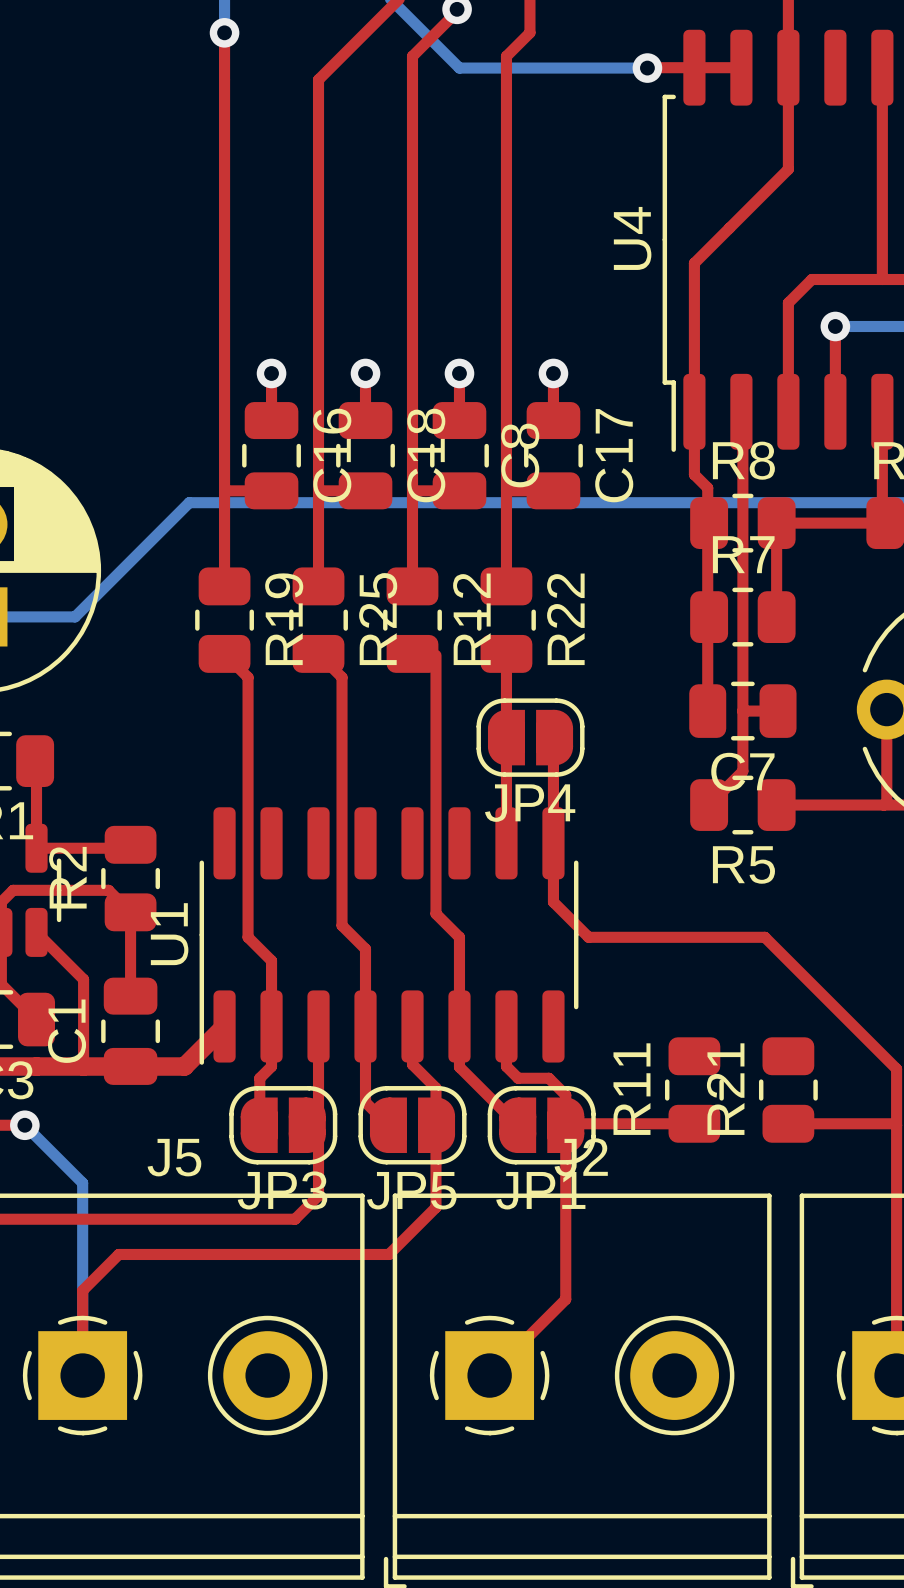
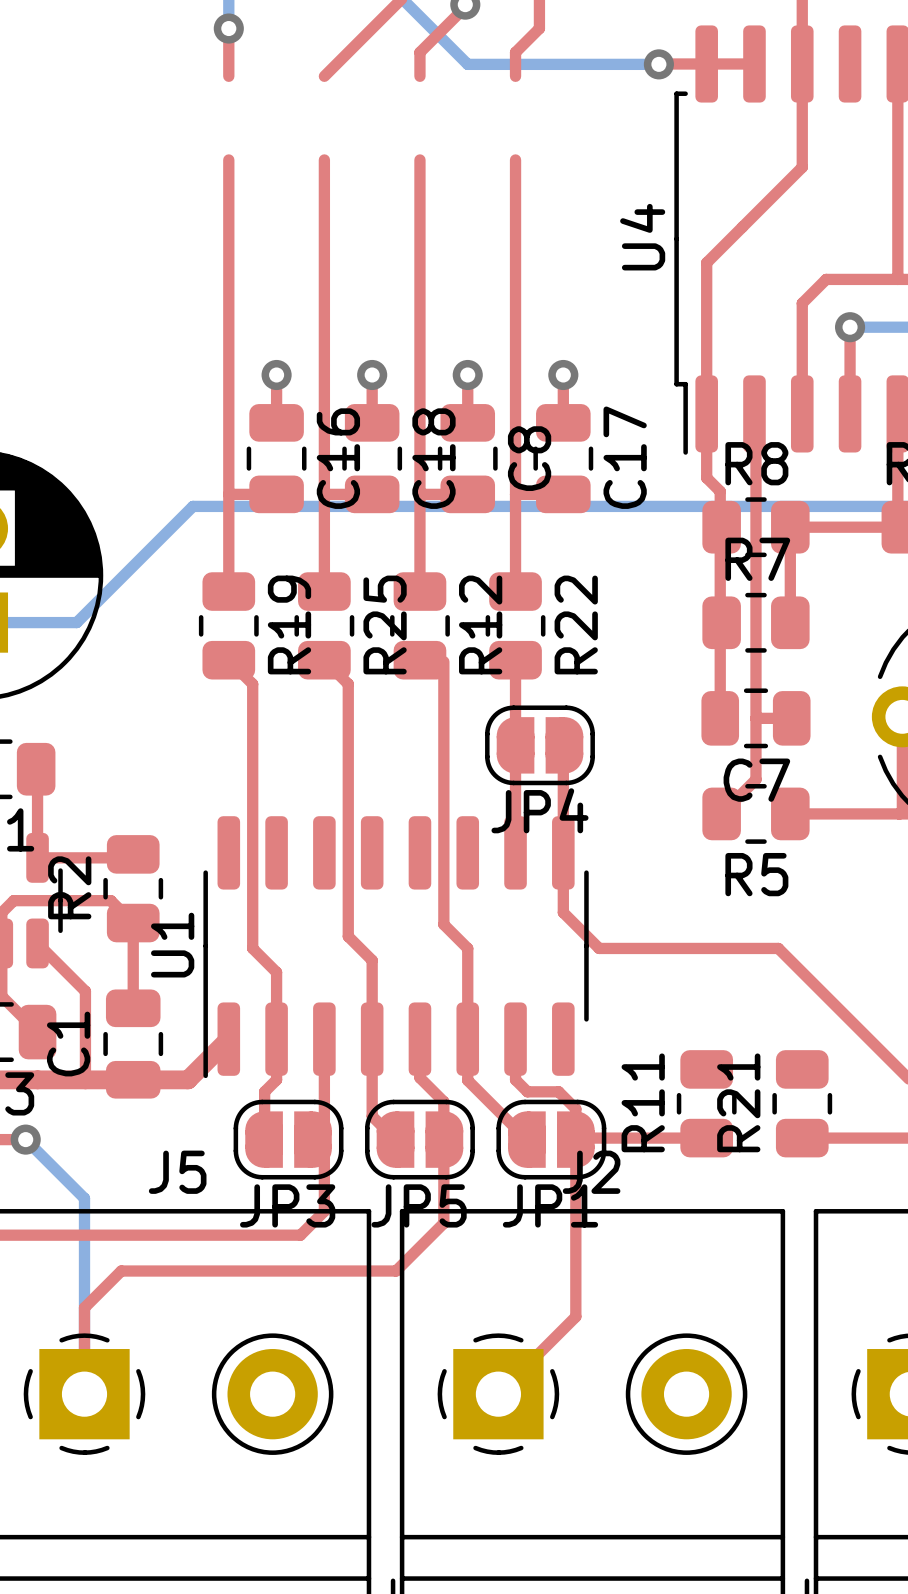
top track: (224, 79) (224, 162) -> none
top track: (318, 79) (318, 162) -> none
top track: (412, 79) (412, 162) -> none
top track: (506, 79) (506, 162) -> none

